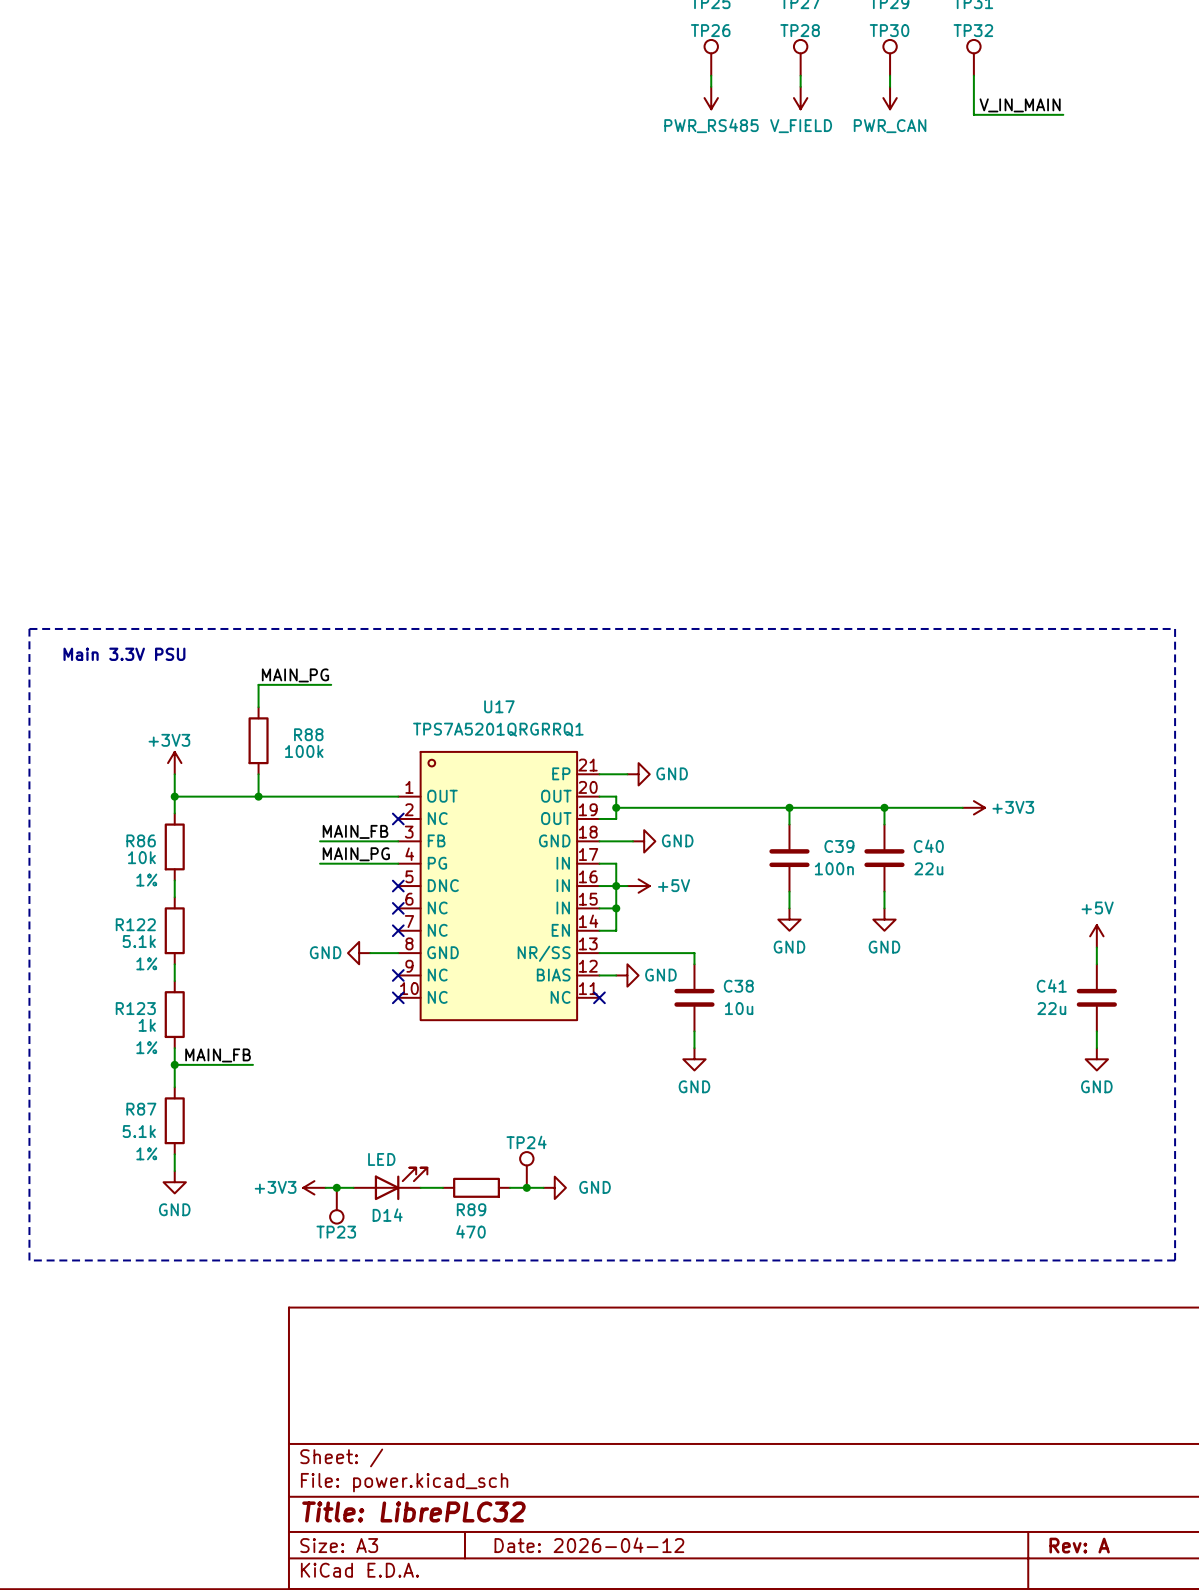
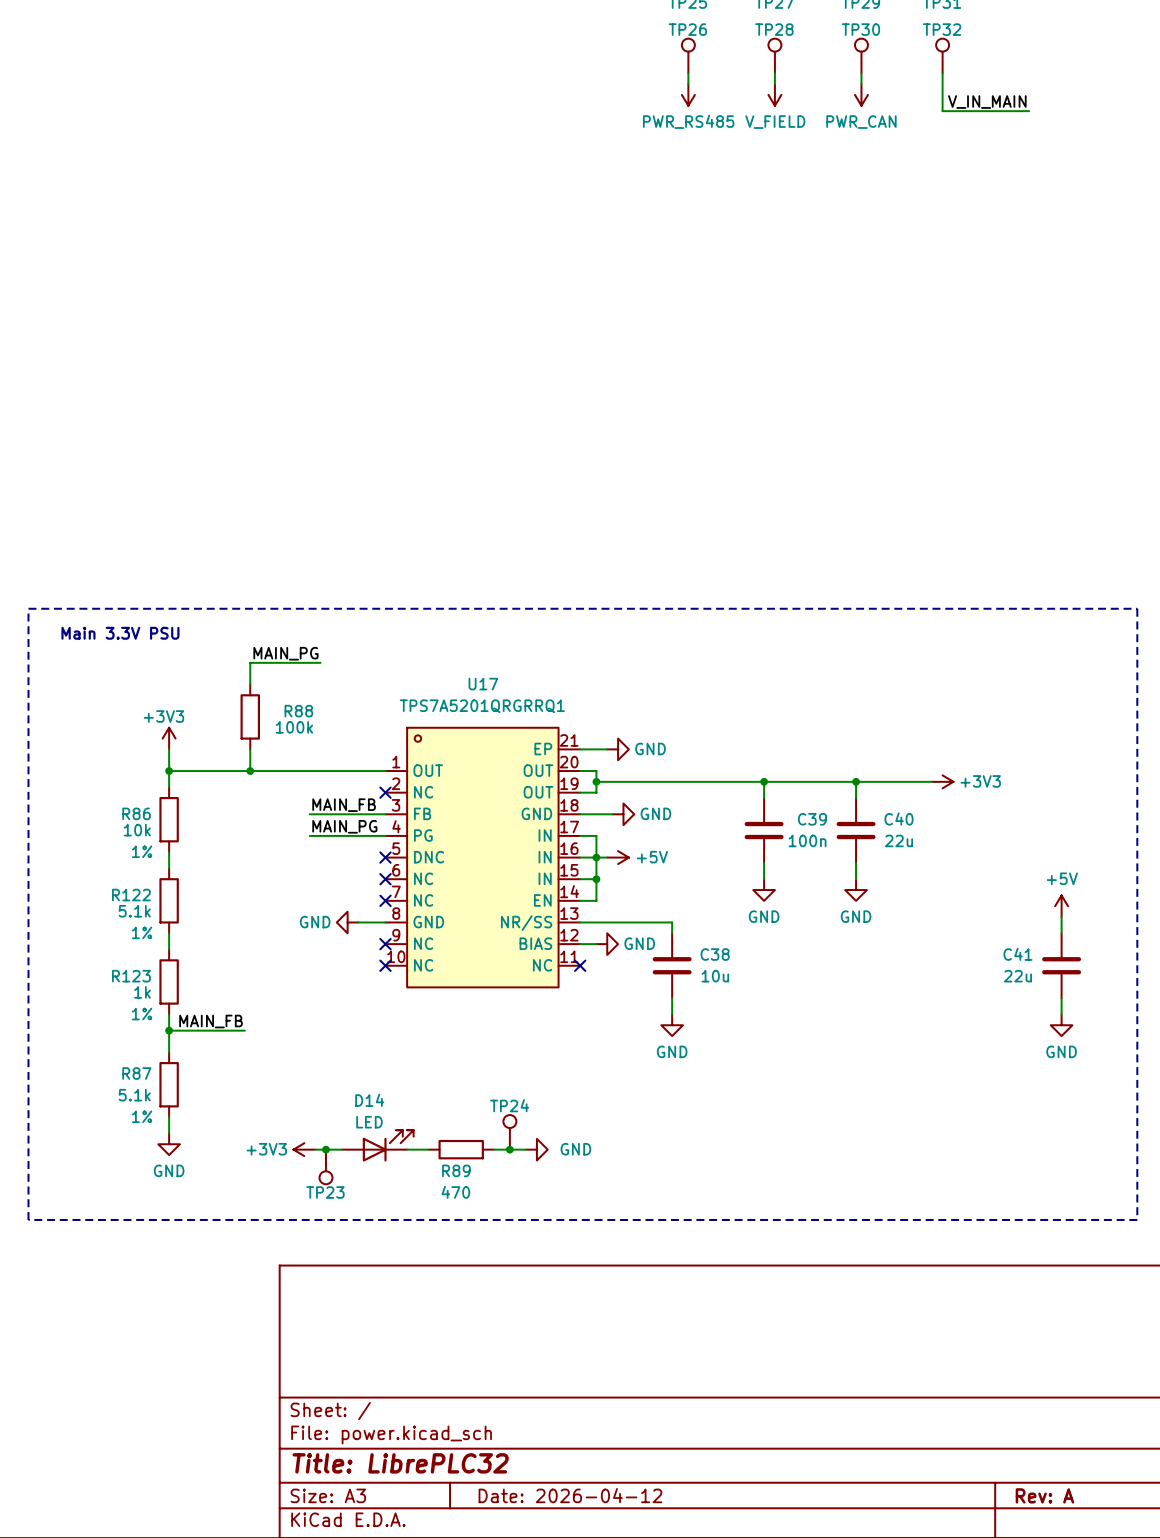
D14 name position: D14 (387, 1215) -> D14 (369, 1100)

